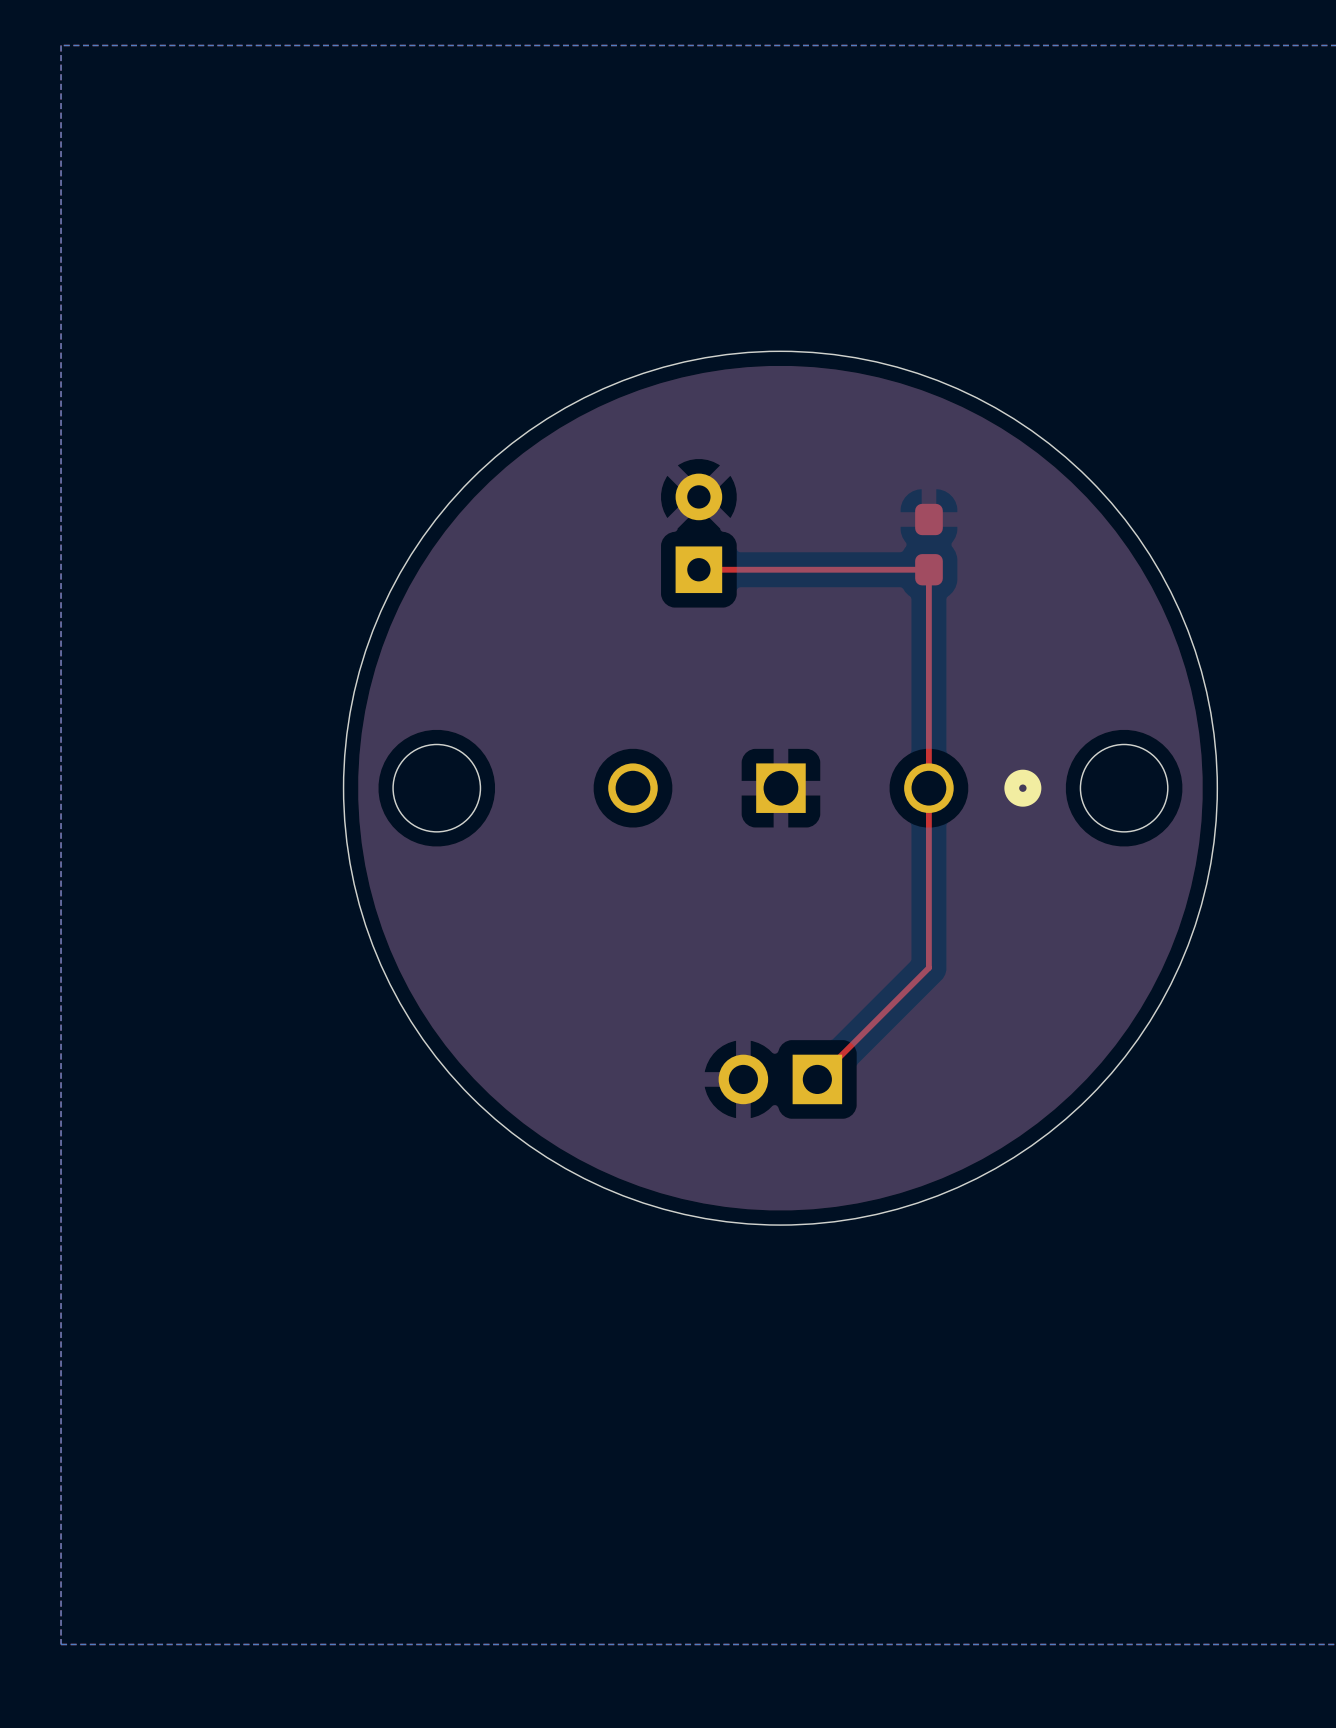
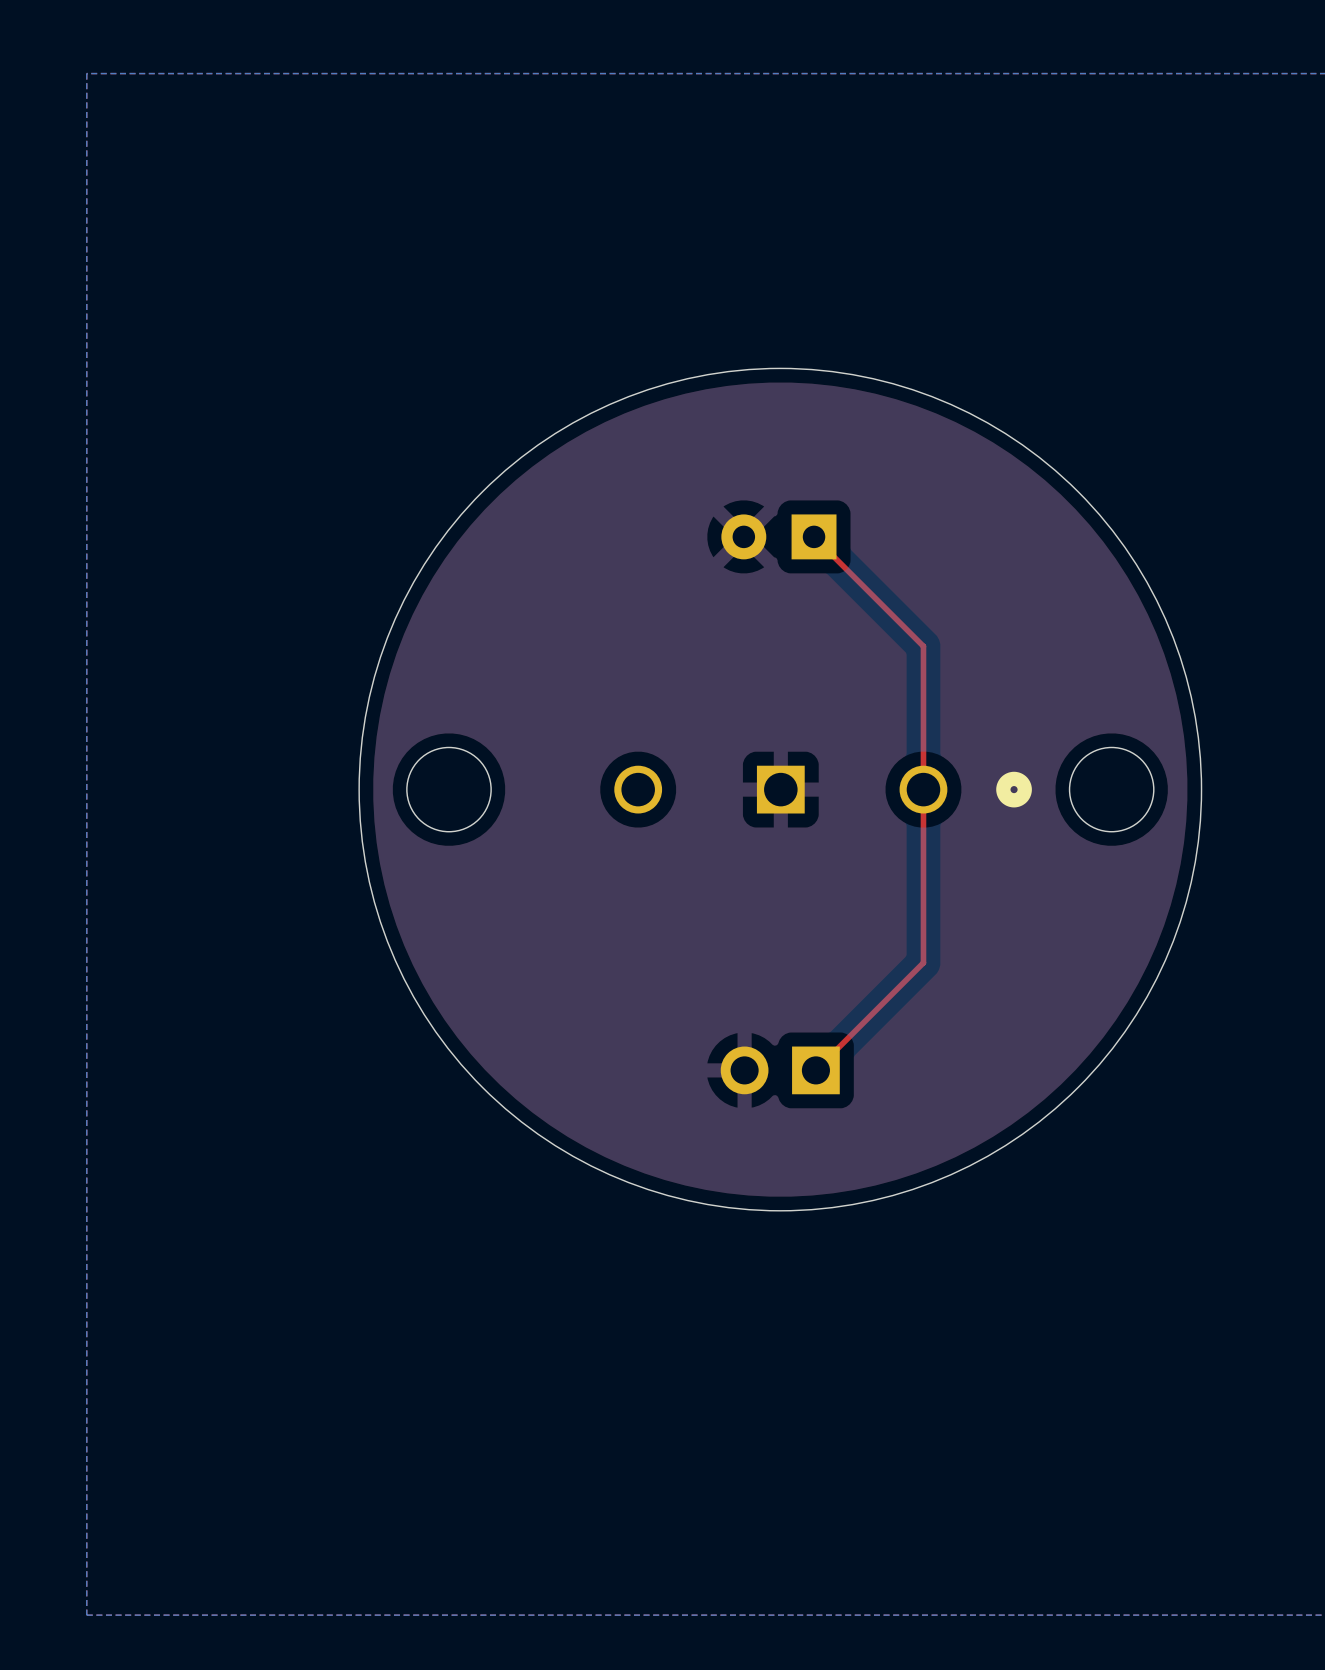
part rotation: 0° (698, 533) -> 90° counterclockwise (778, 536)
part position: (698, 533) -> (778, 536)
part: (928, 544) -> none
top track: (928, 569) (928, 639) -> (814, 536) (923, 646)
top track: (928, 569) (698, 569) -> none

